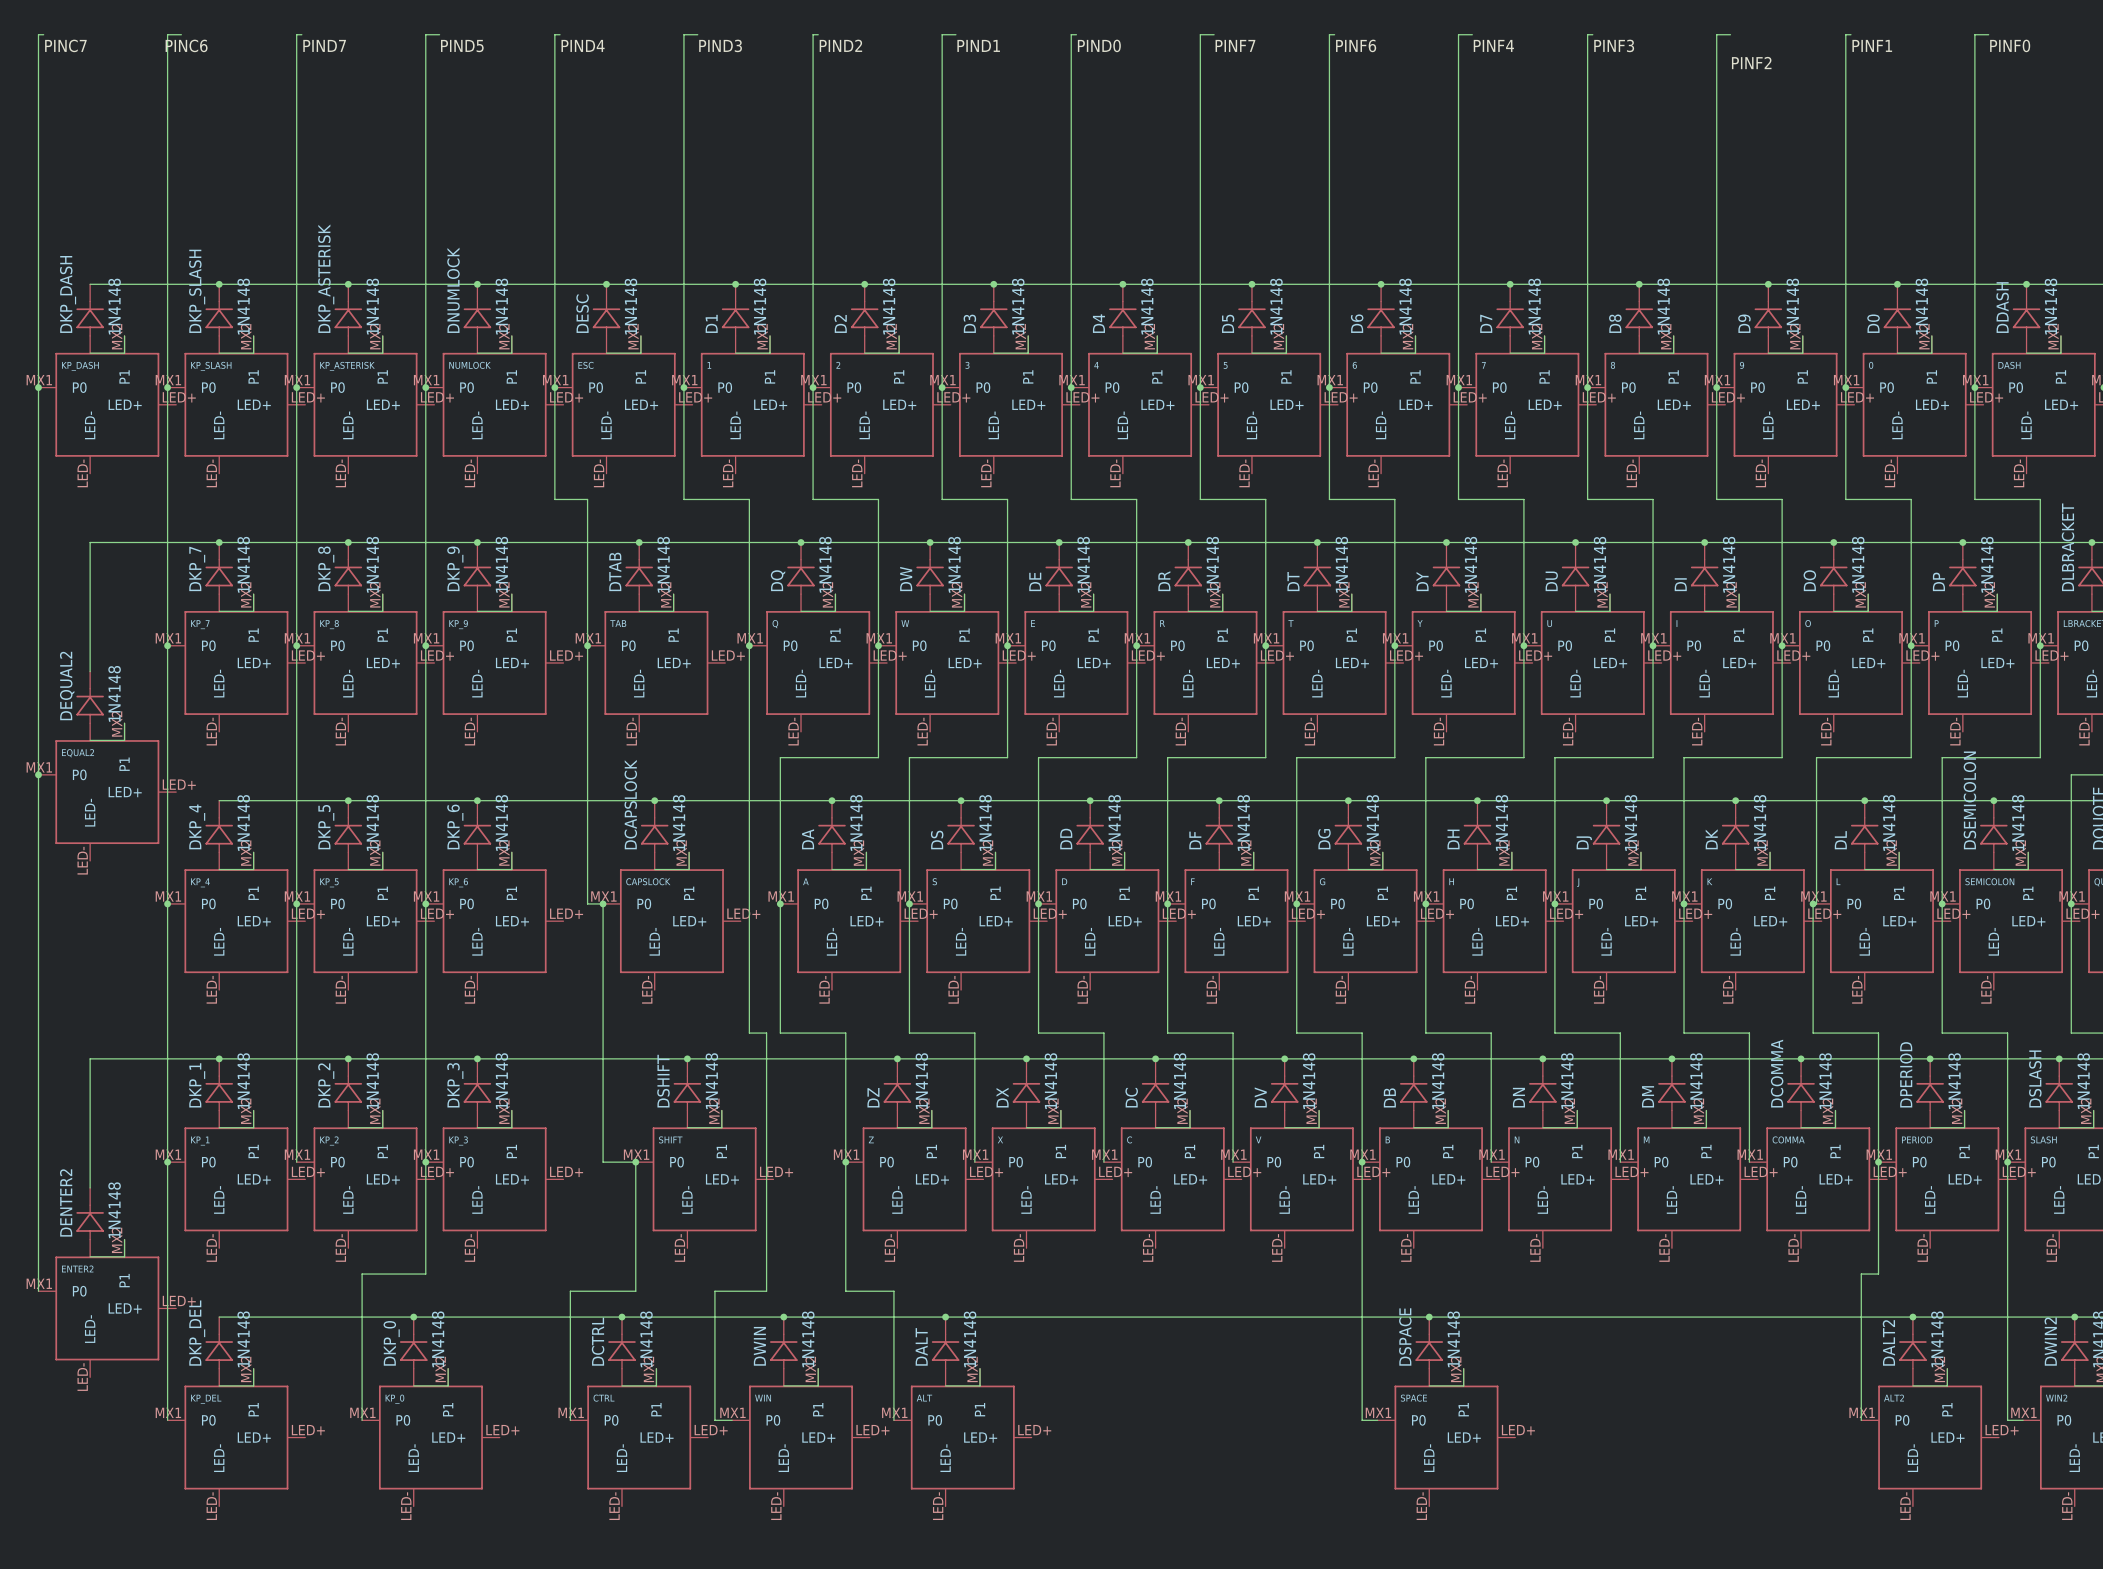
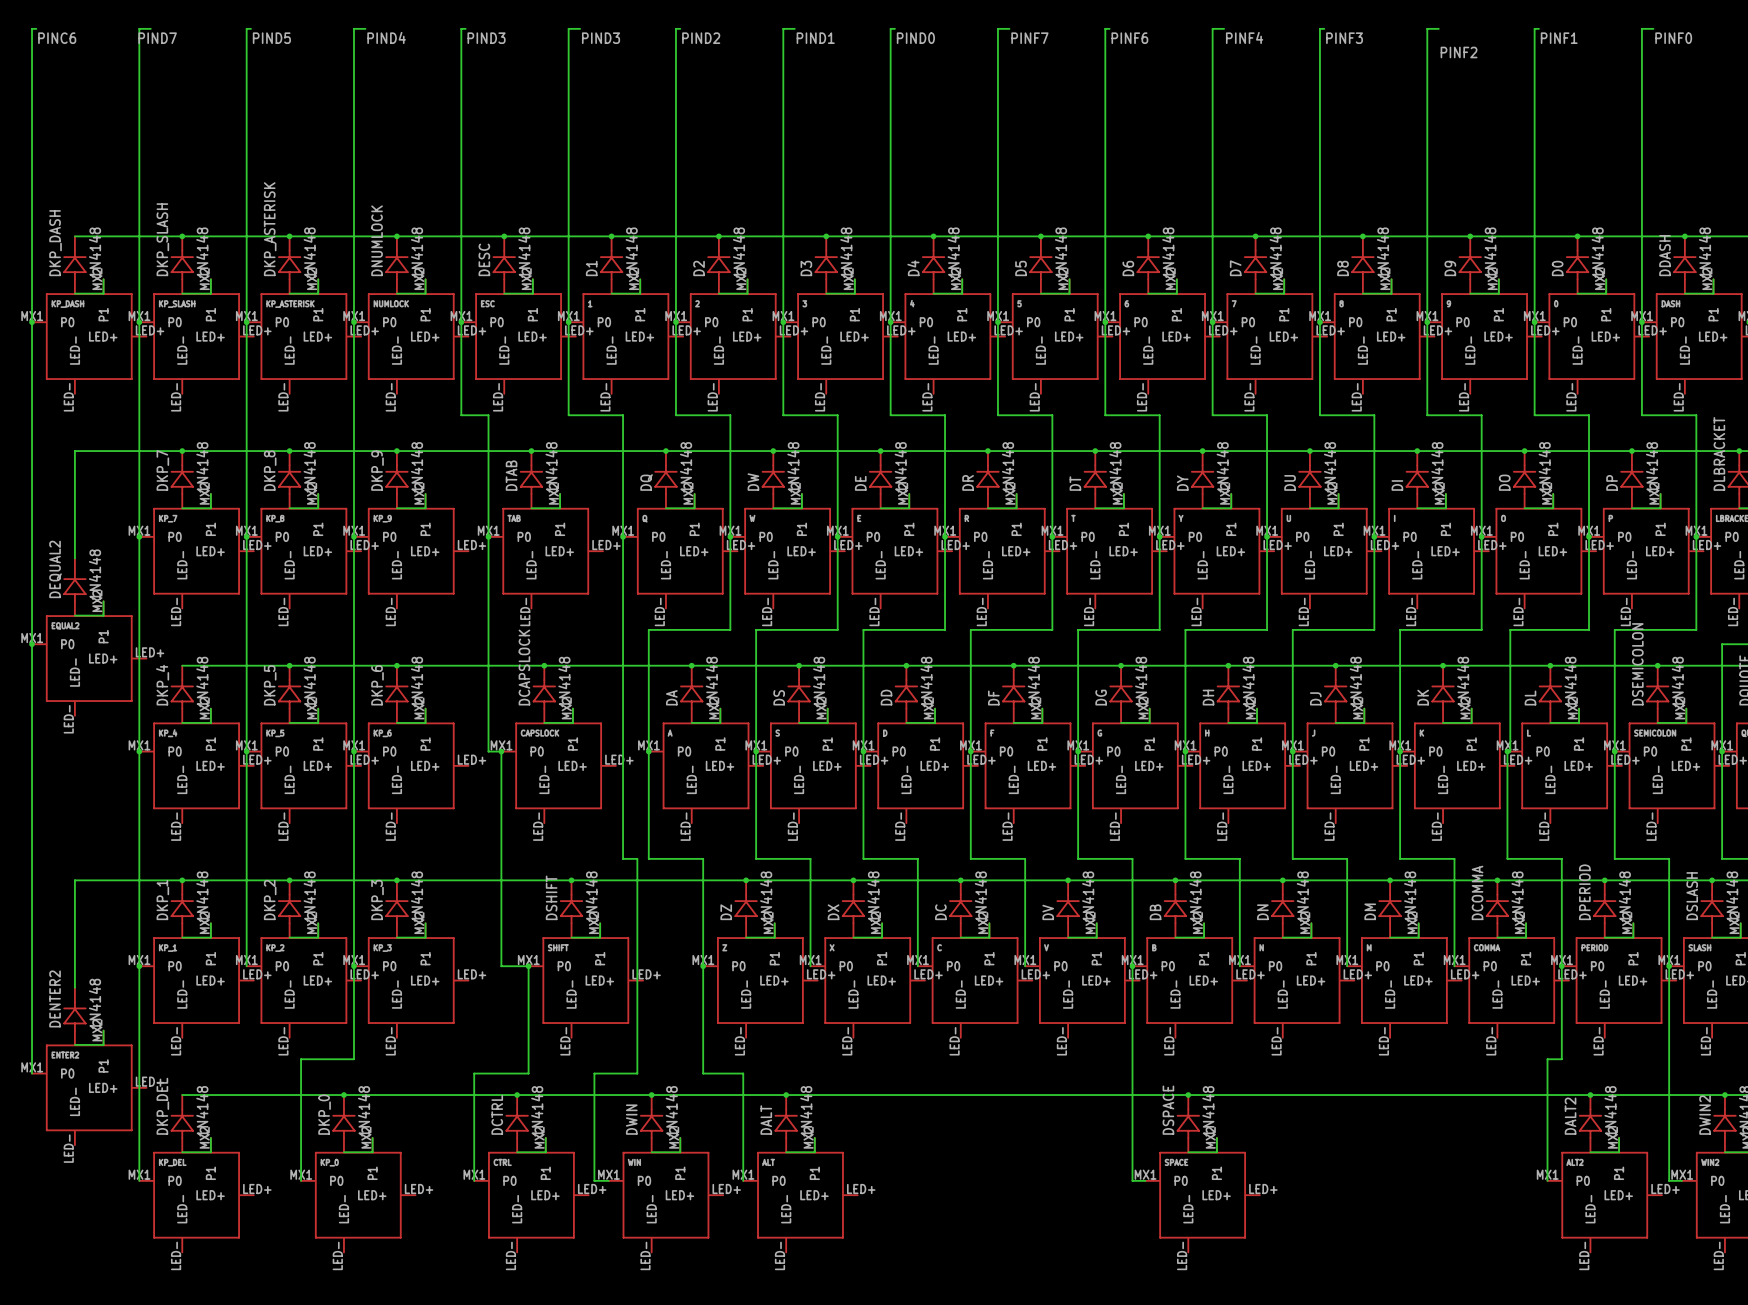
label: PINC7 (65, 45) -> PINC6 (57, 38)
label: PINC6 (186, 45) -> PIND7 (157, 38)
label: PIND7 (324, 45) -> PIND5 (271, 38)
label: PIND4 (583, 45) -> PIND3 (486, 38)
label: PIND5 (462, 46) -> PIND4 (386, 37)

